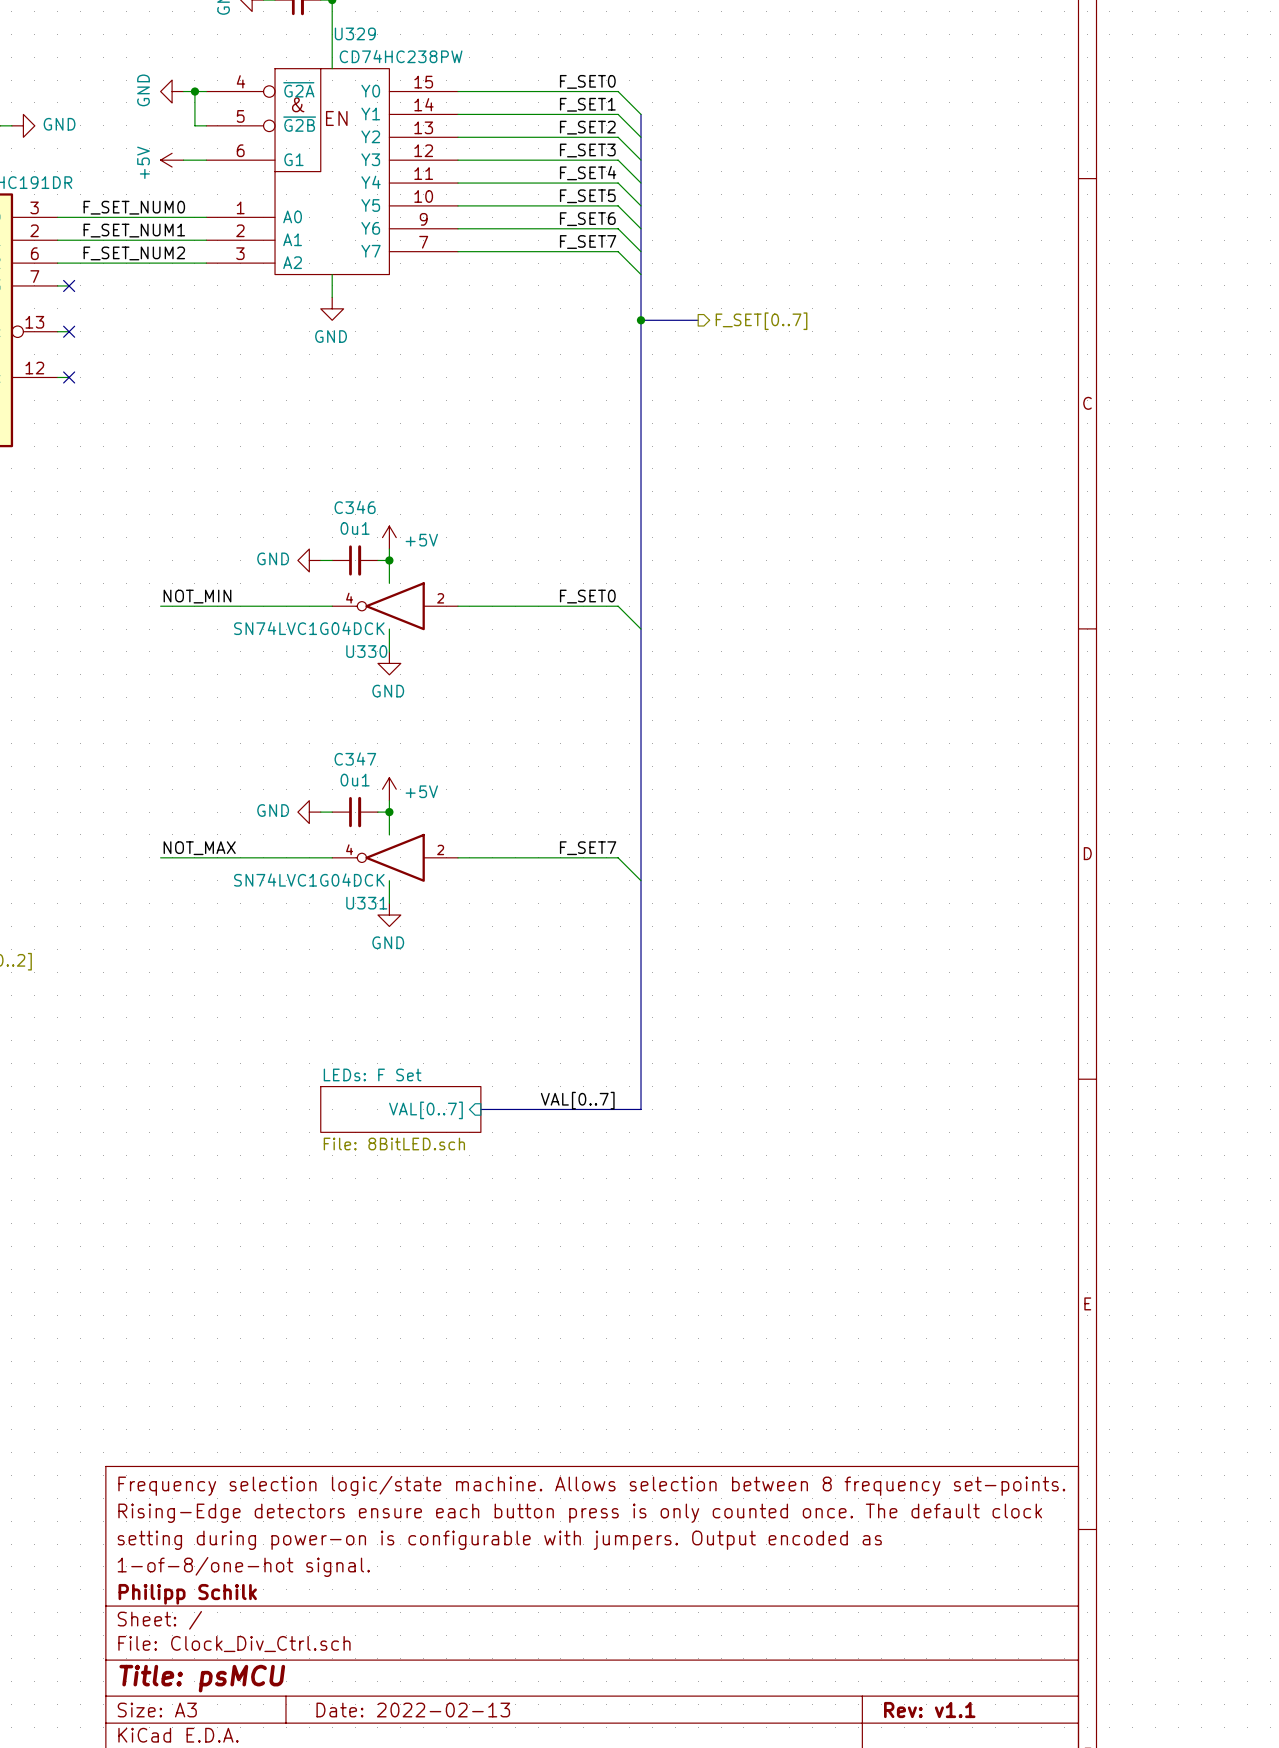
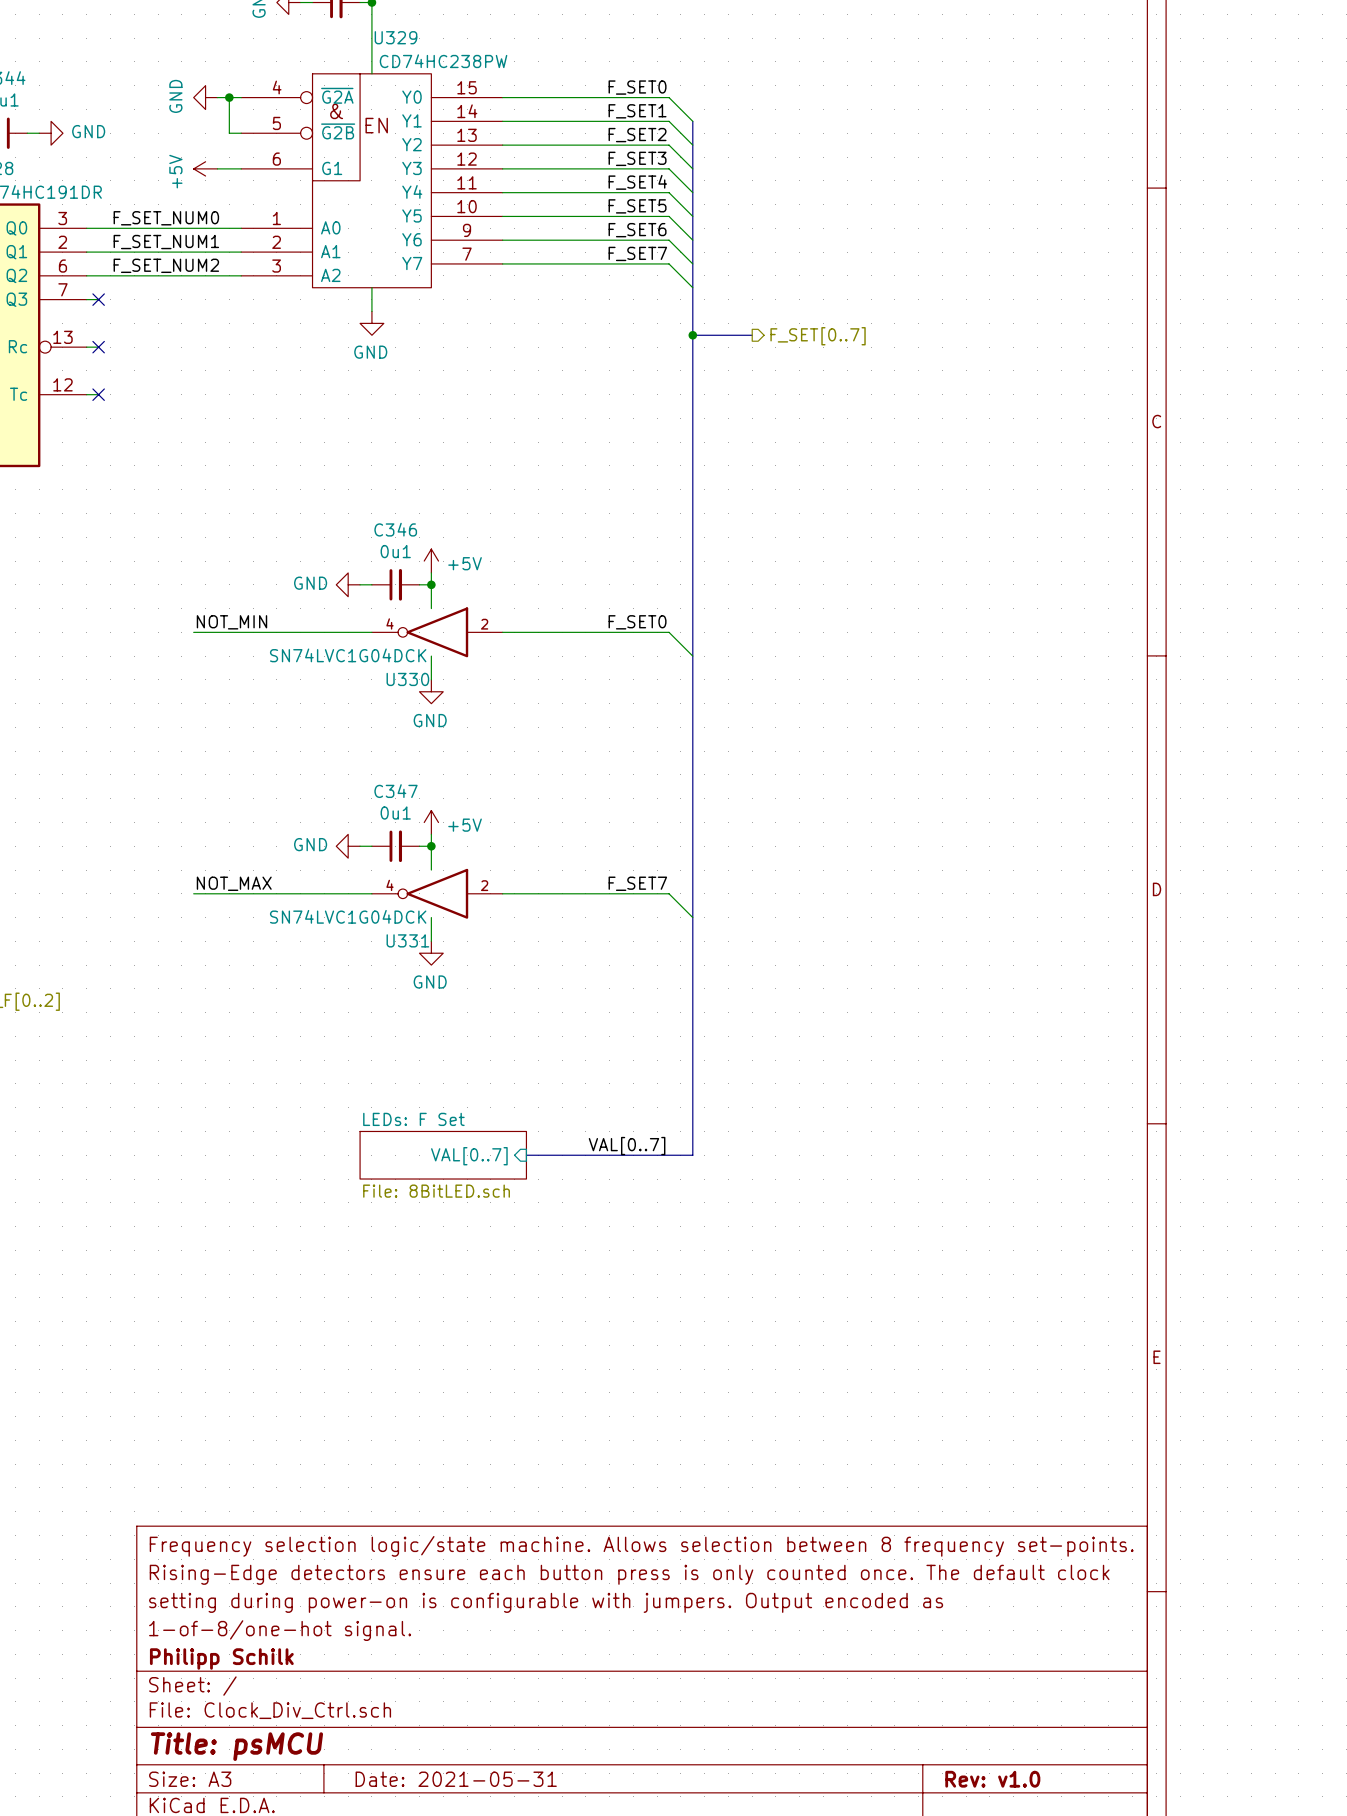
title block: Date: 2022-02-13 (413, 1710) -> Date: 2021-05-31 (456, 1779)
title block: Rev: v1.1 (929, 1710) -> Rev: v1.0 (992, 1779)

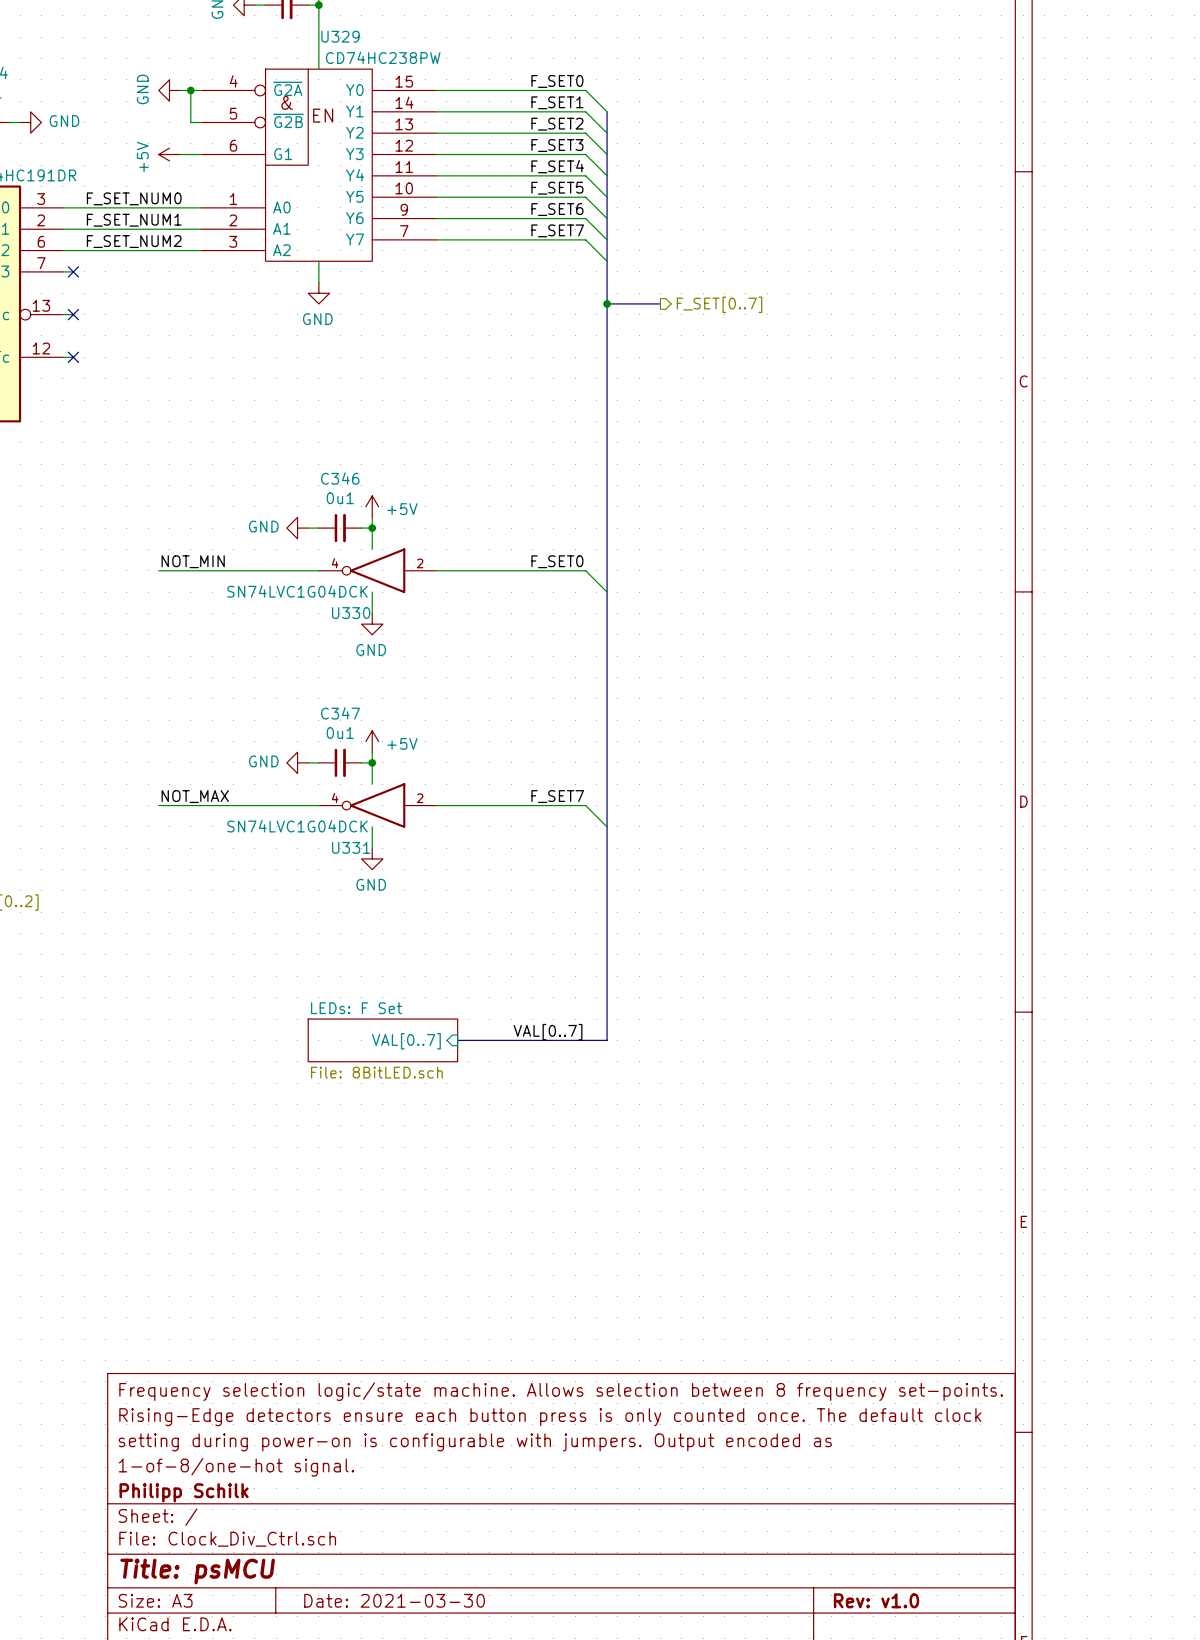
title block: Date: 2021-05-31 (456, 1779) -> Date: 2021-03-30 (394, 1600)

